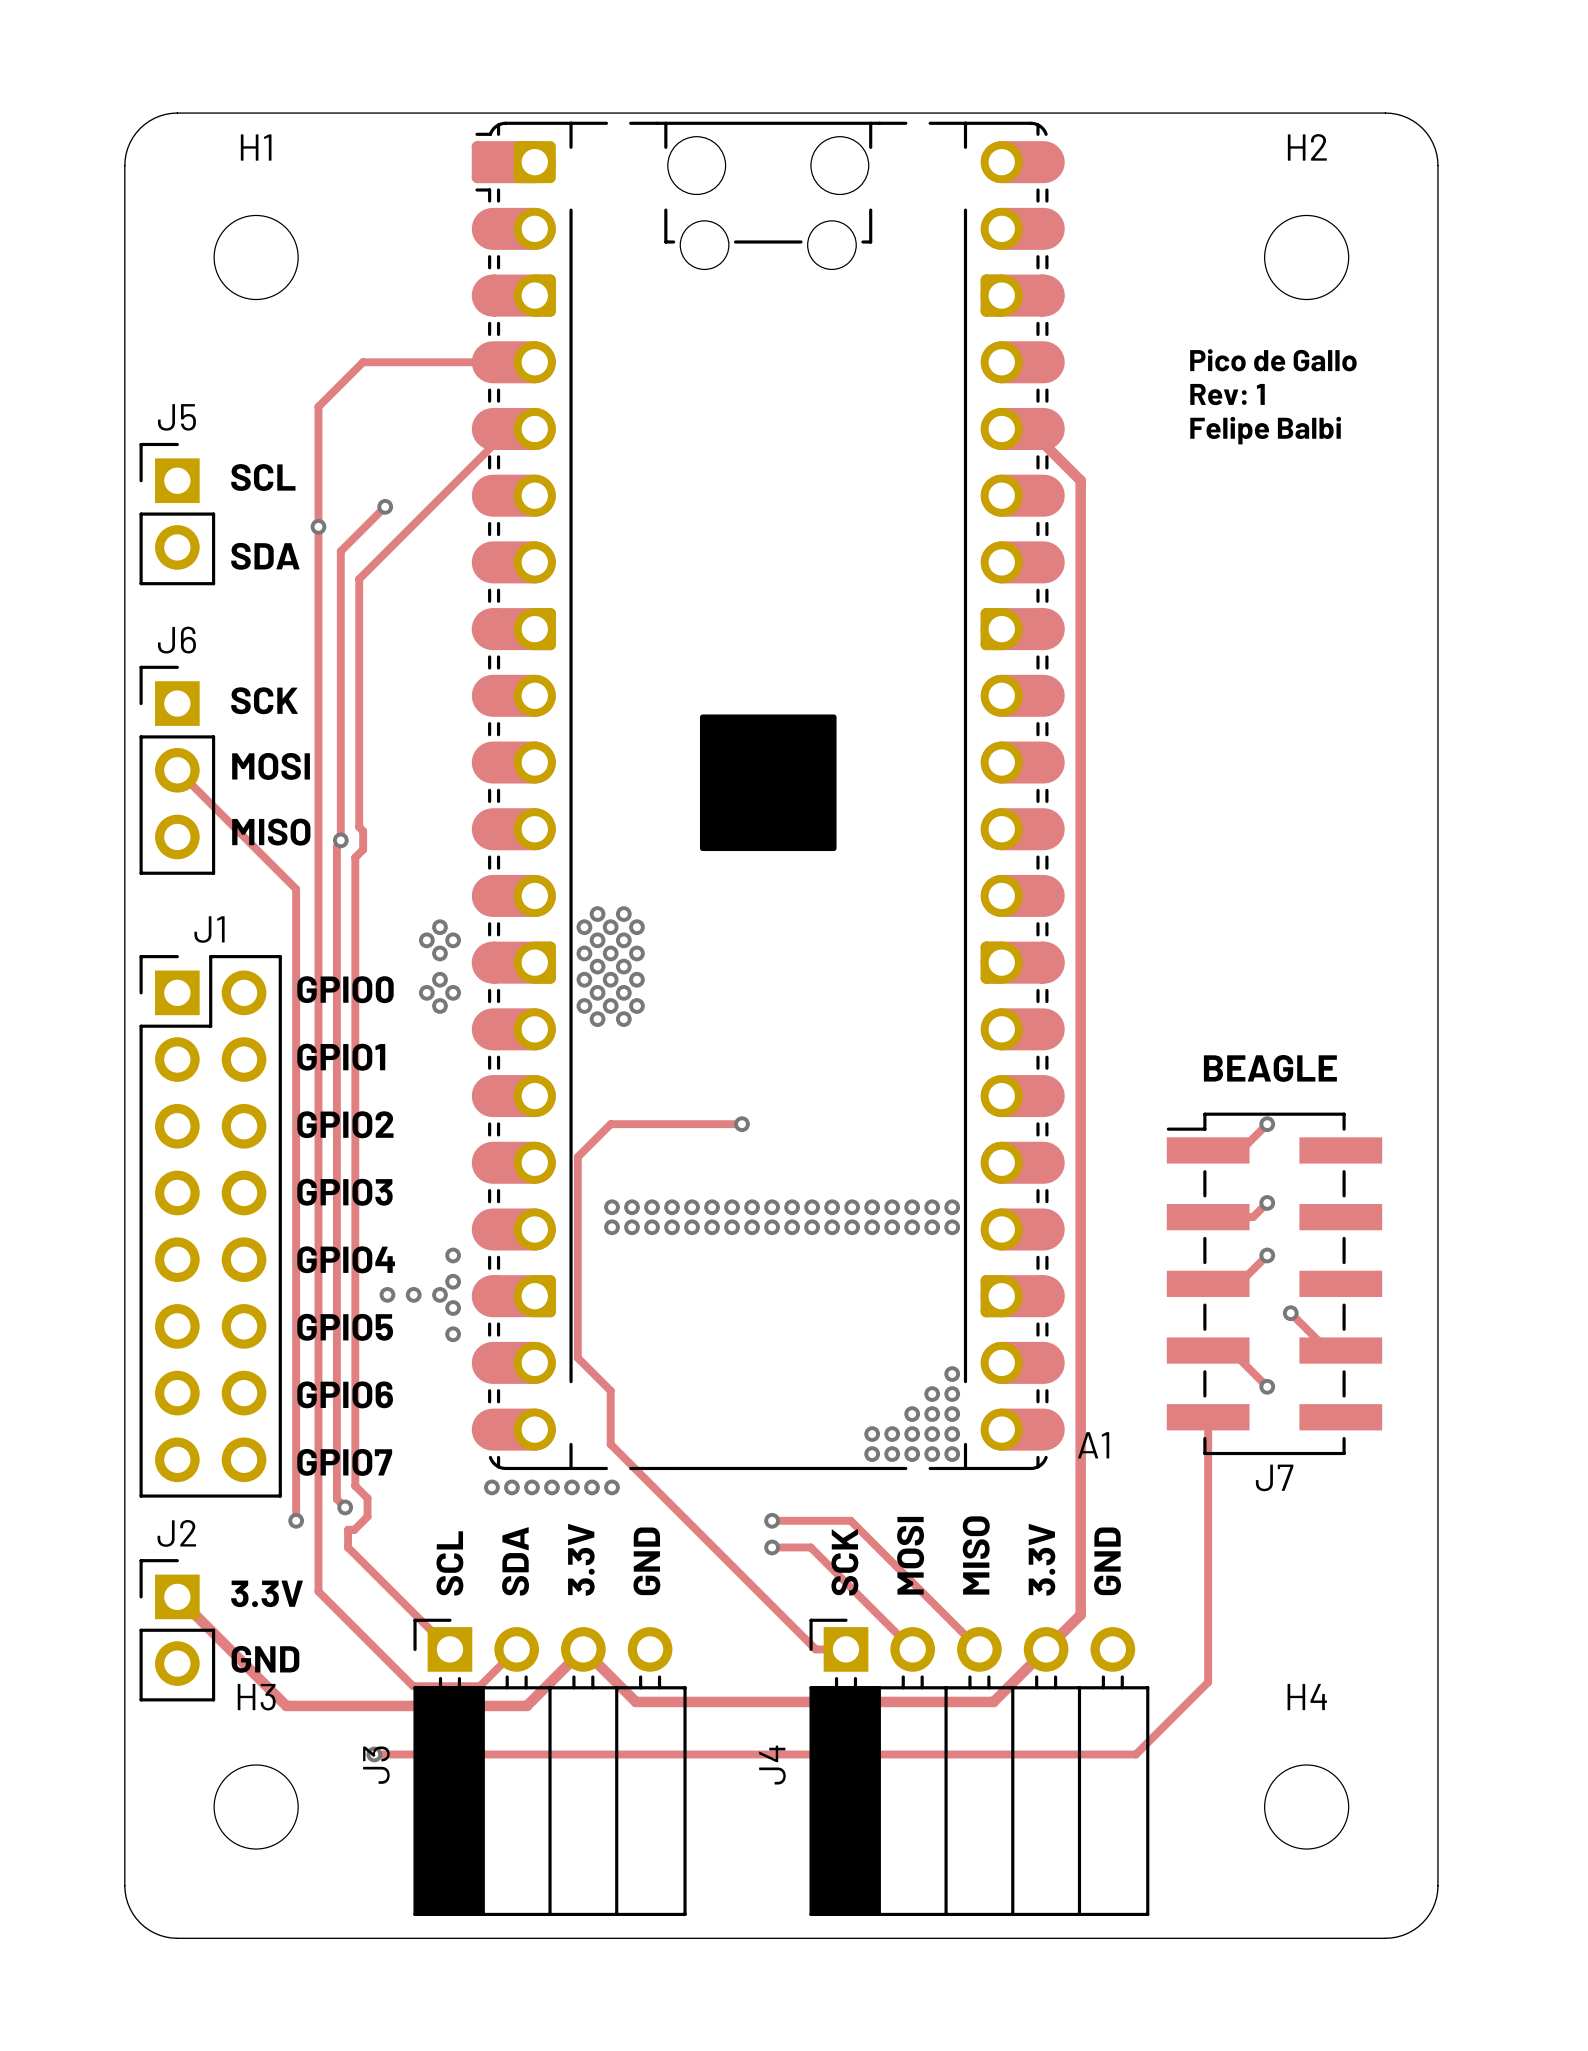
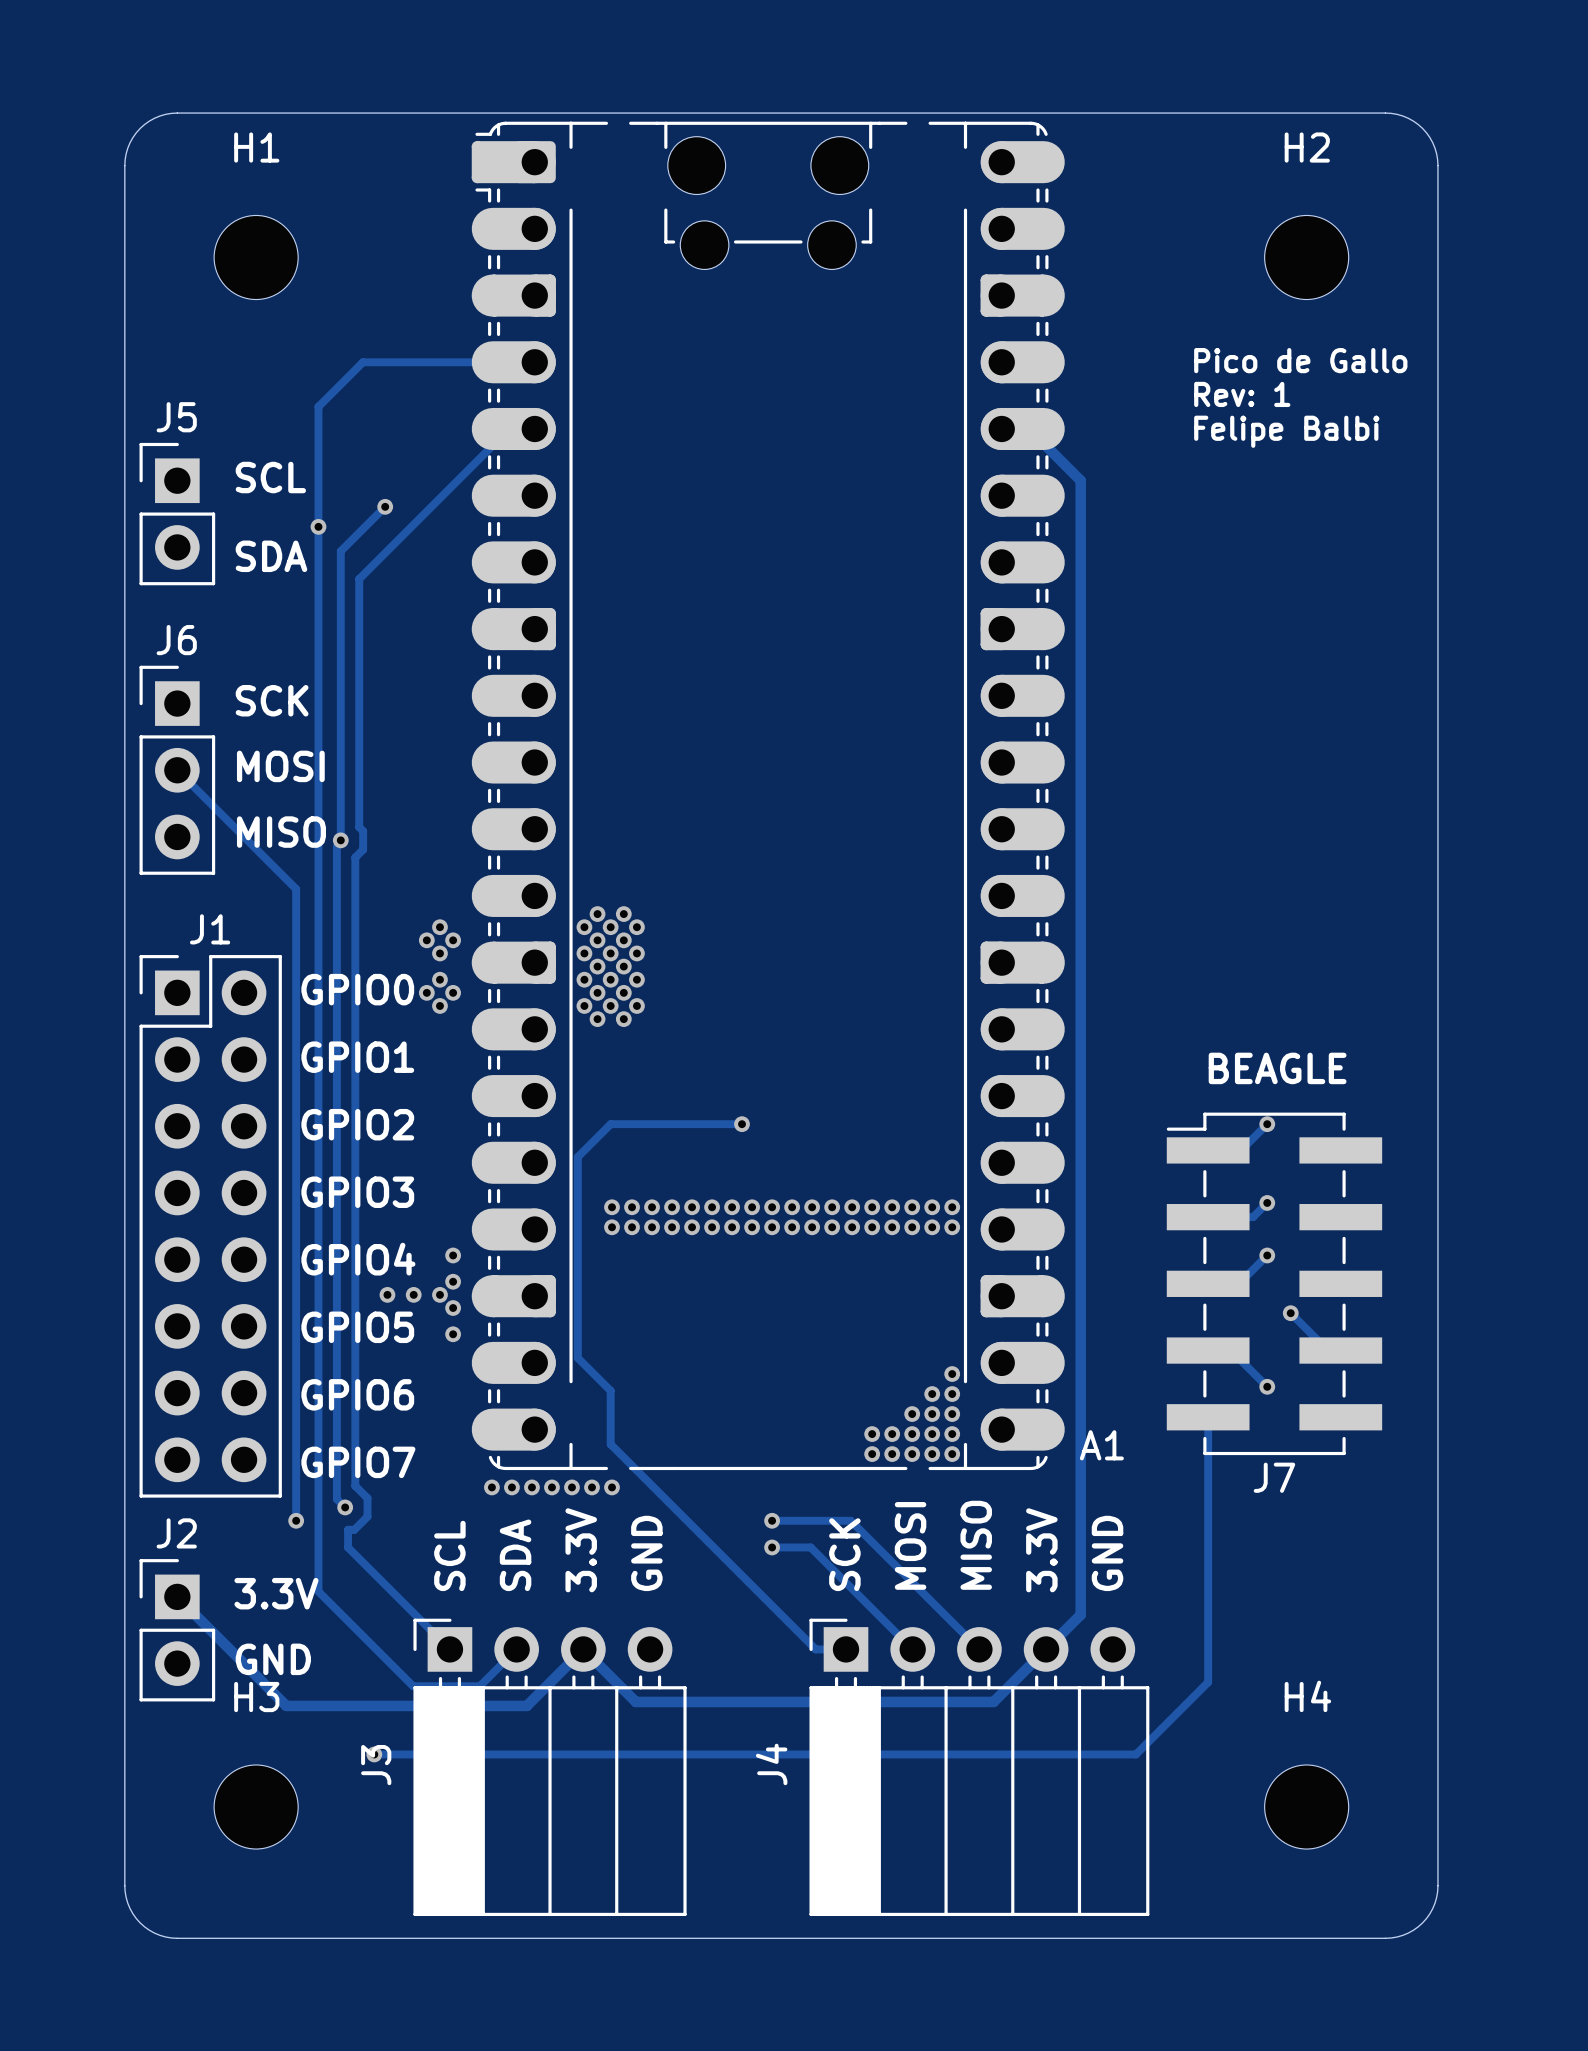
drawing: [699, 714, 837, 852] -> none

